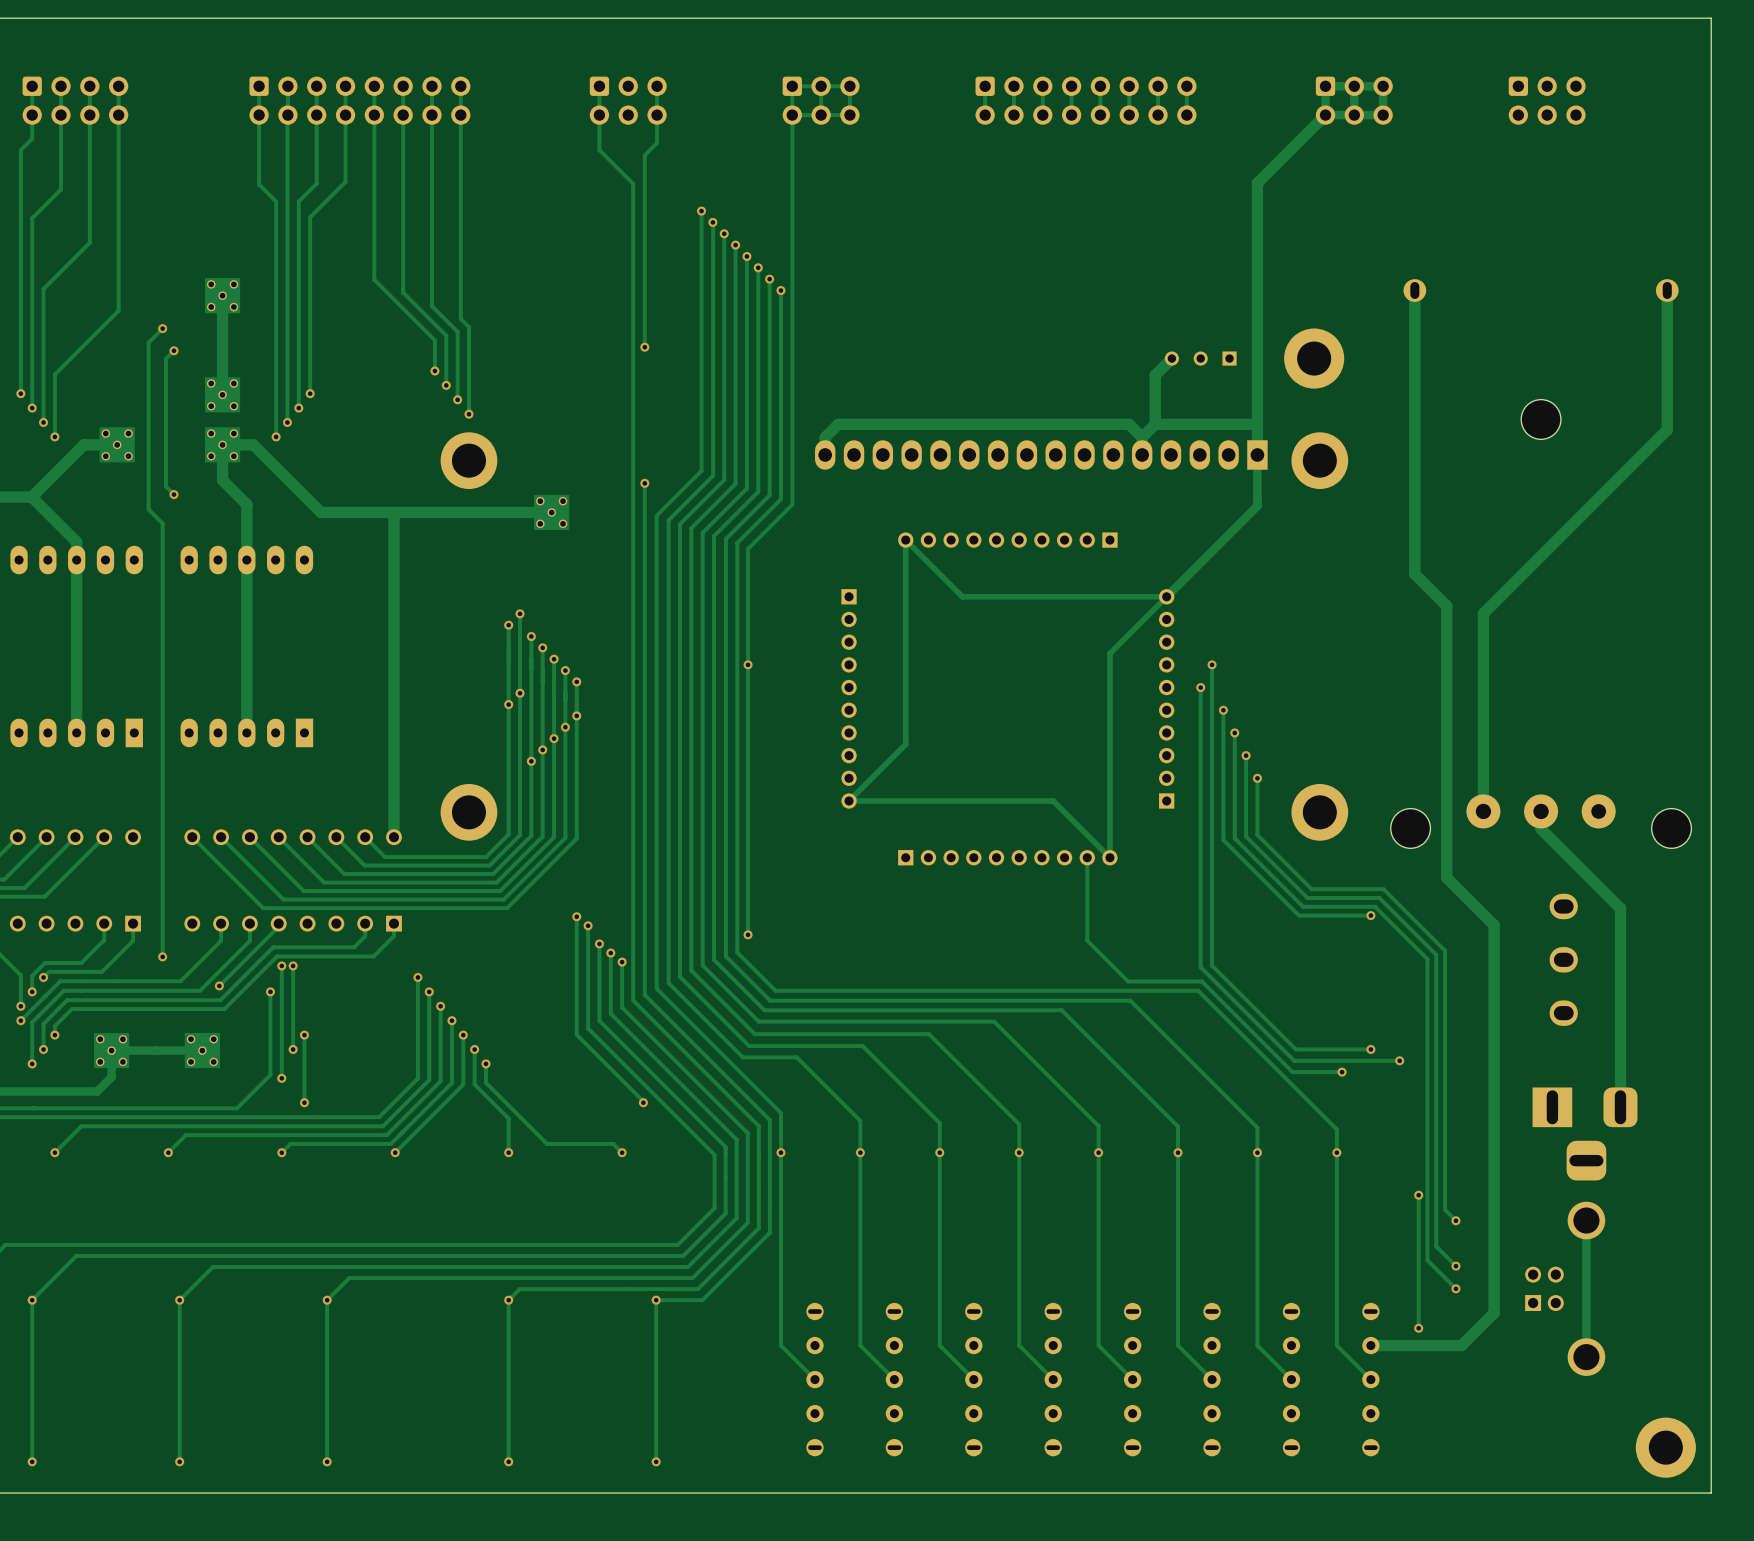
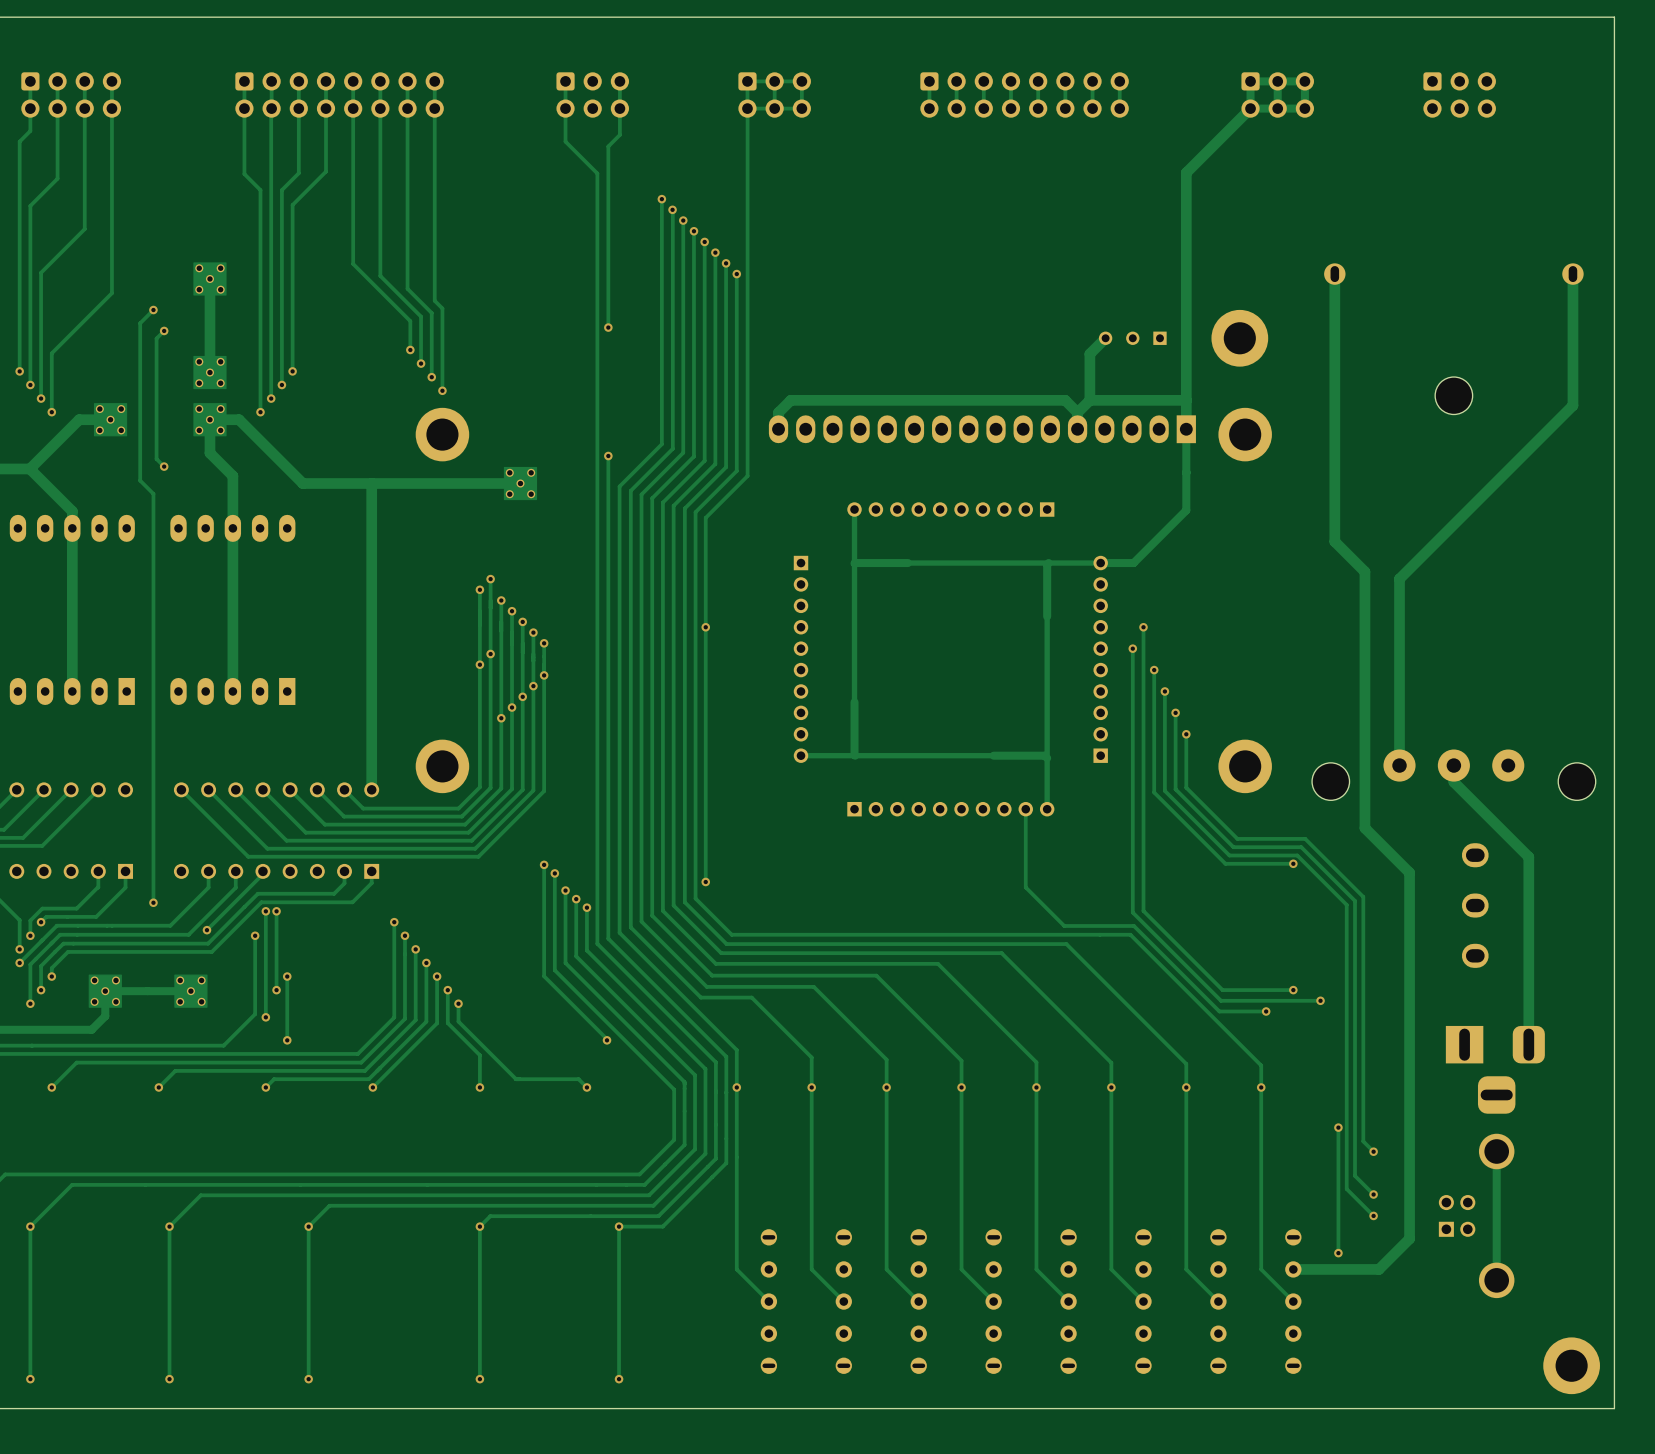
track: (1257, 506) (1109, 653) -> (1186, 477) (1186, 510) (1133, 563) (1100, 563)
track: (905, 540) (962, 596) -> (854, 563) (908, 563)
track: none -> (1048, 563) (1047, 616)
track: (905, 744) (849, 801) -> (854, 702) (855, 755)
track: (1053, 801) (1109, 857) -> (993, 755) (1044, 755) (1047, 758)

